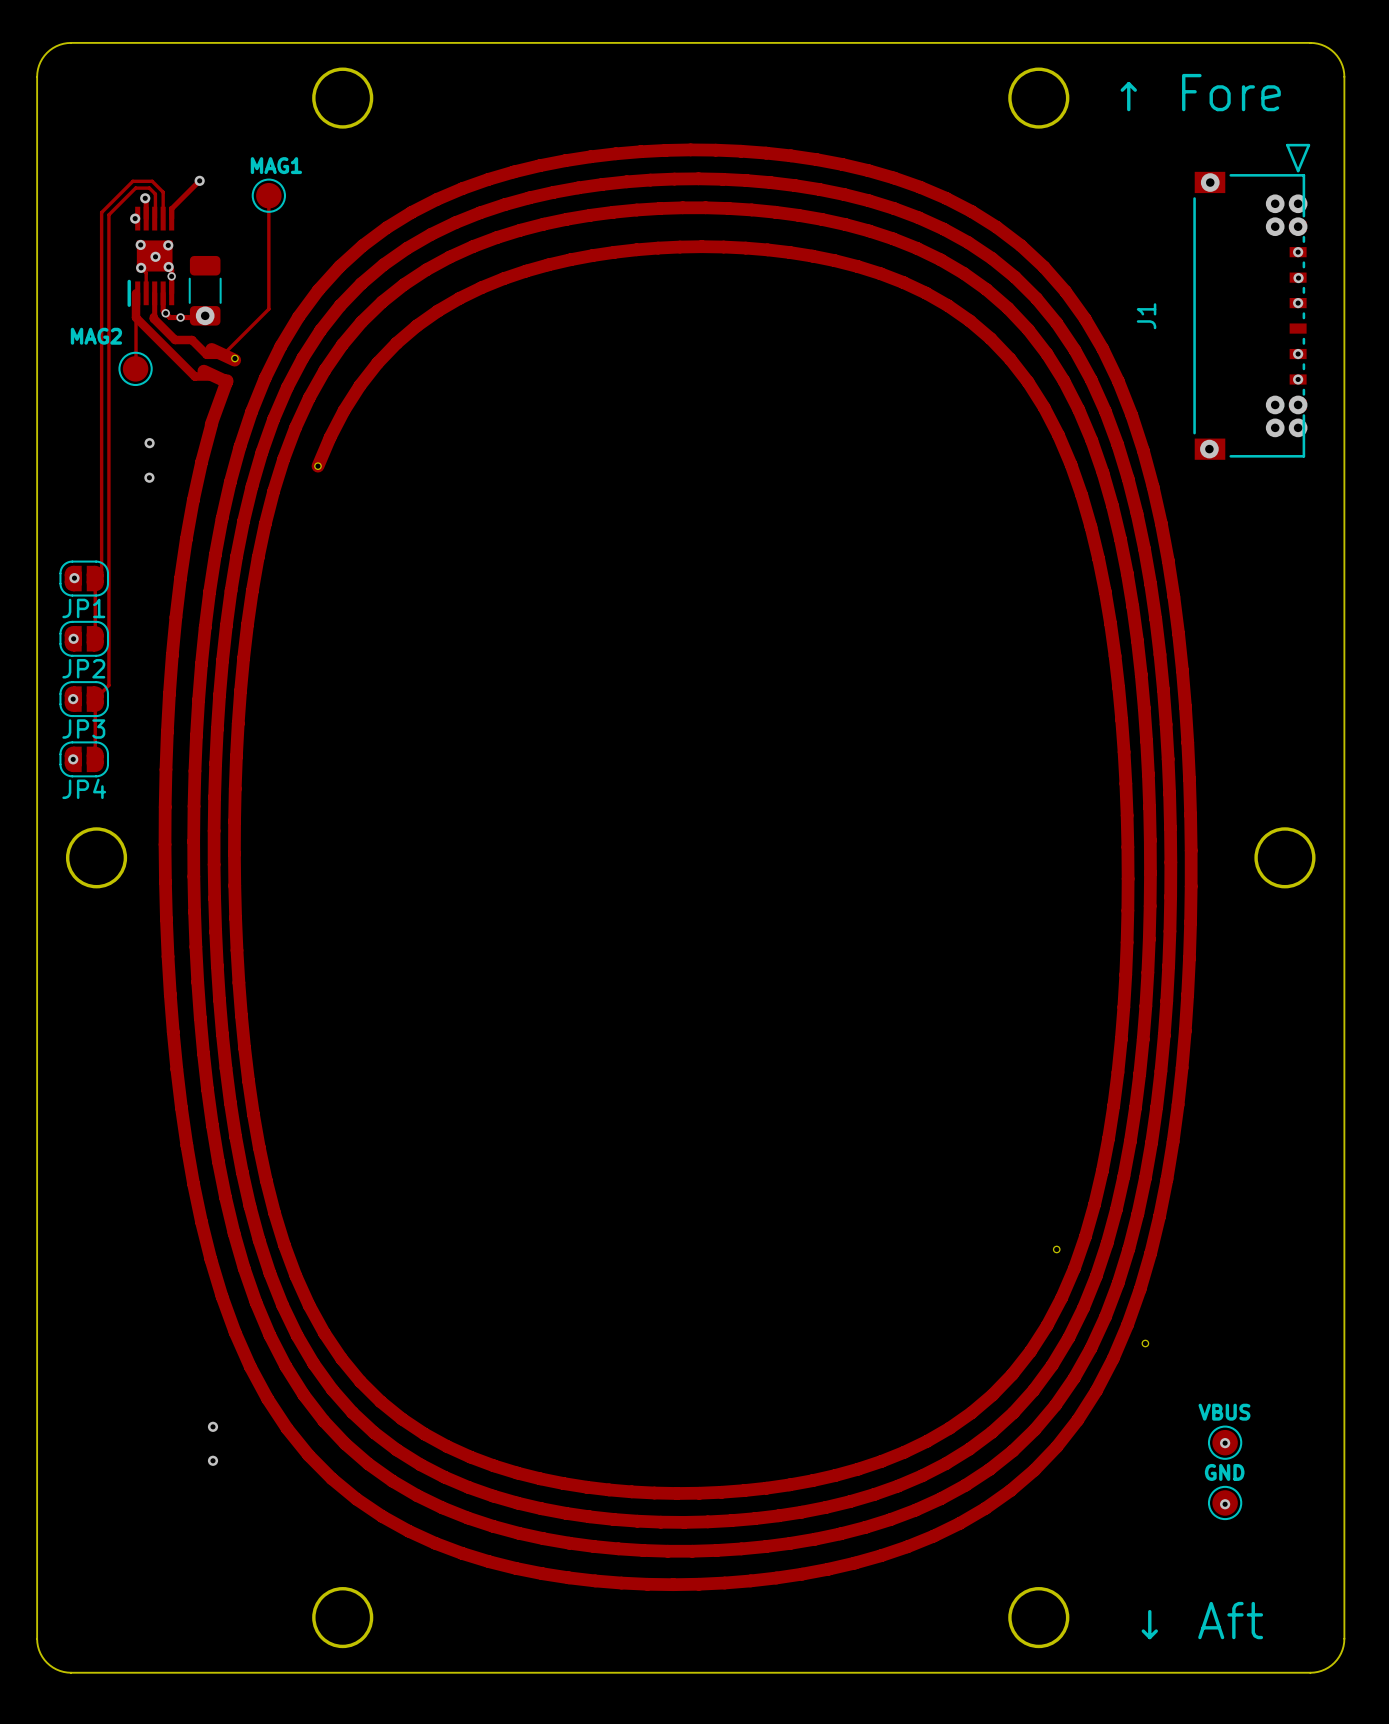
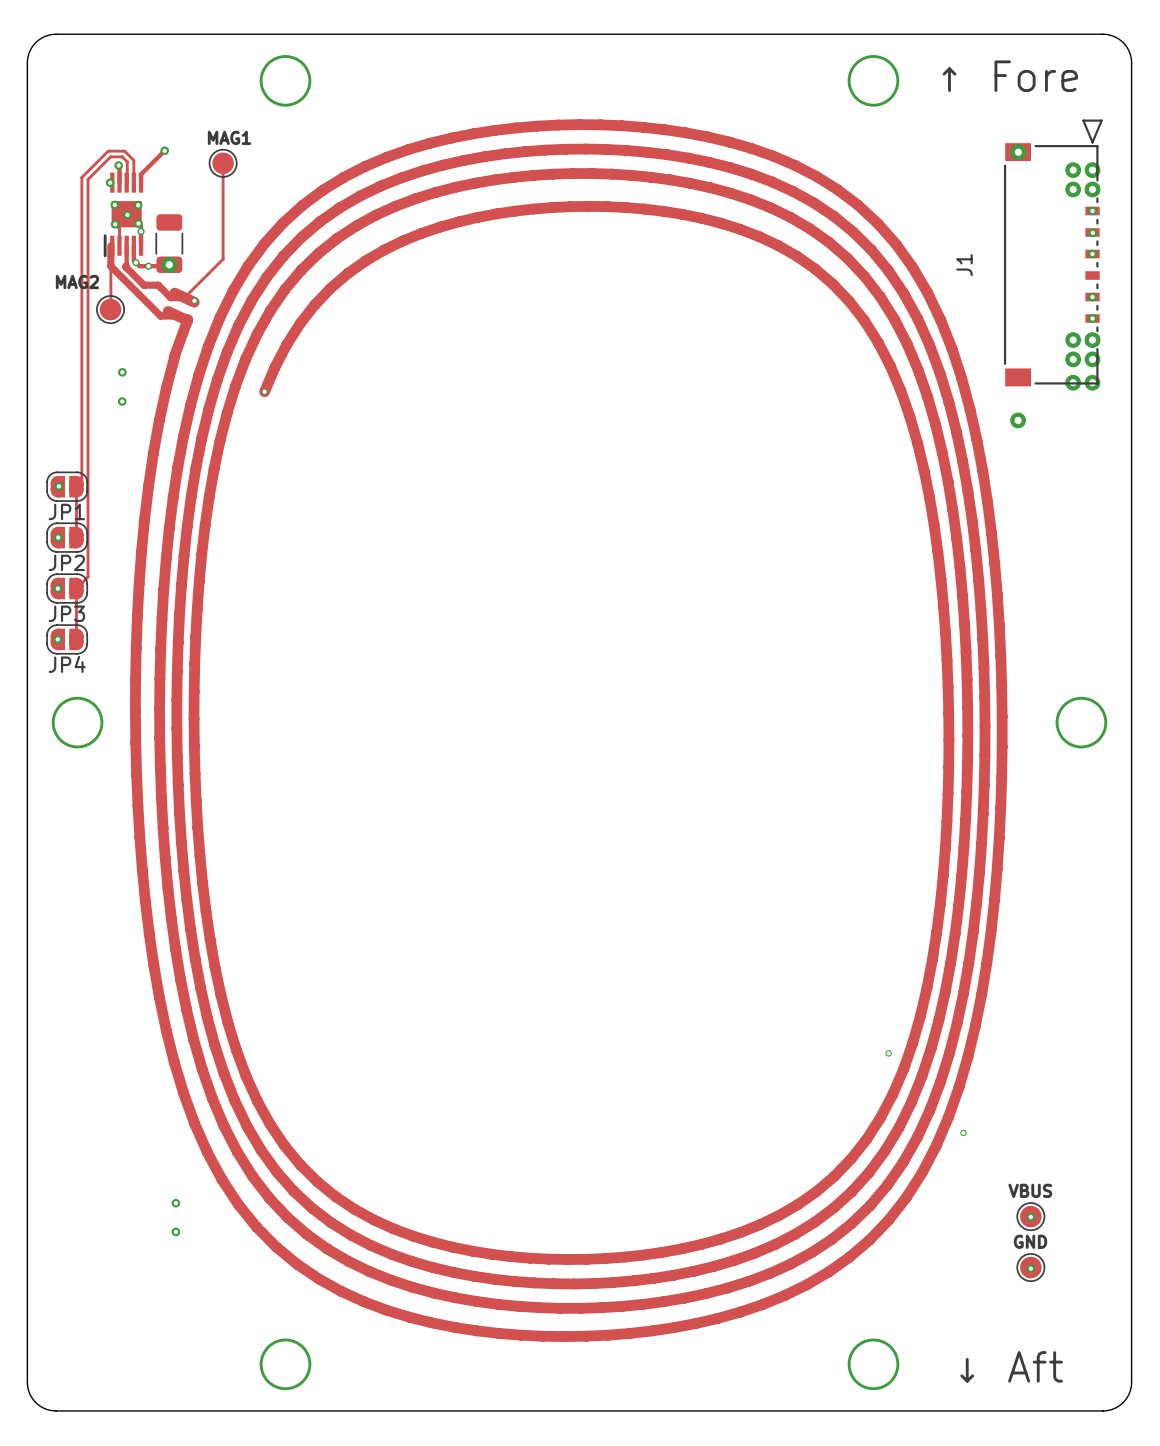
via: (1209, 449) -> none
via: none -> (1073, 382)
via: none -> (1092, 382)
via: none -> (1018, 420)

